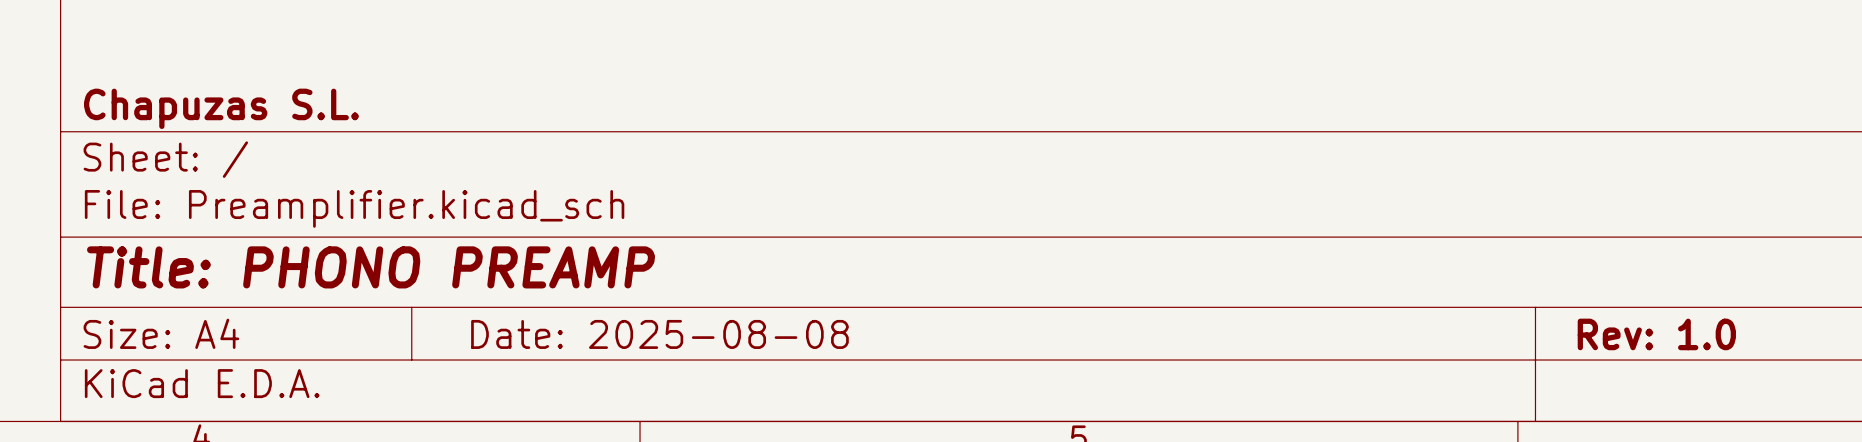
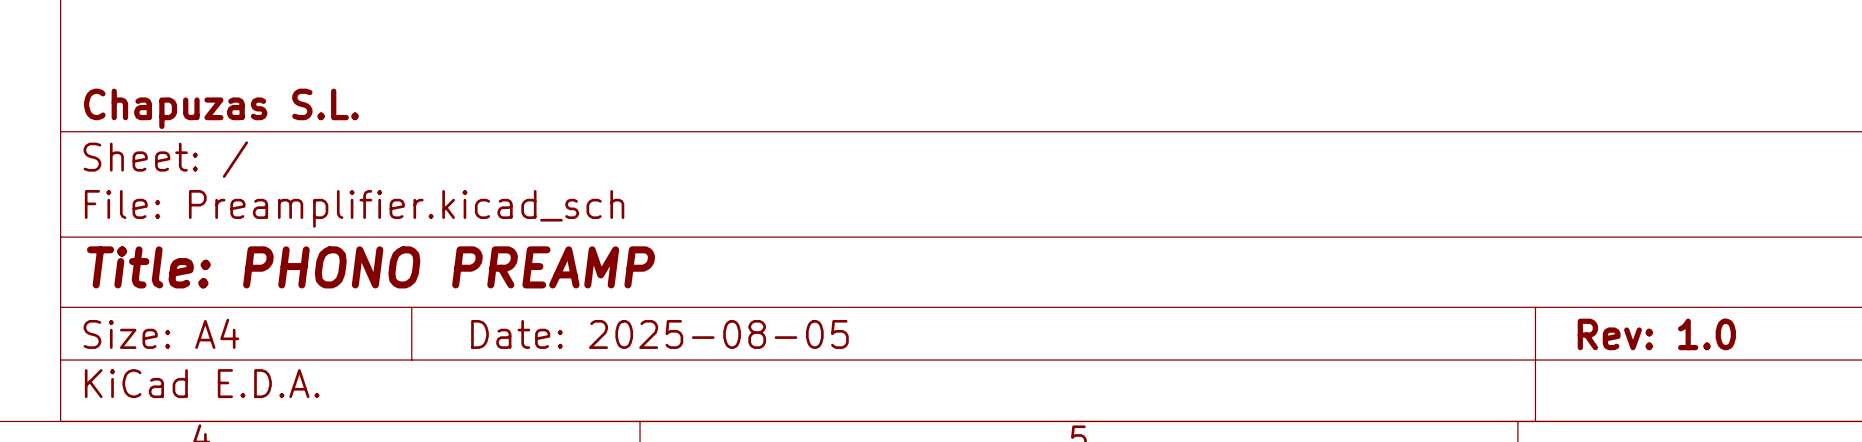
title block: Date: 2025-08-08 (659, 334) -> Date: 2025-08-05 (659, 334)

